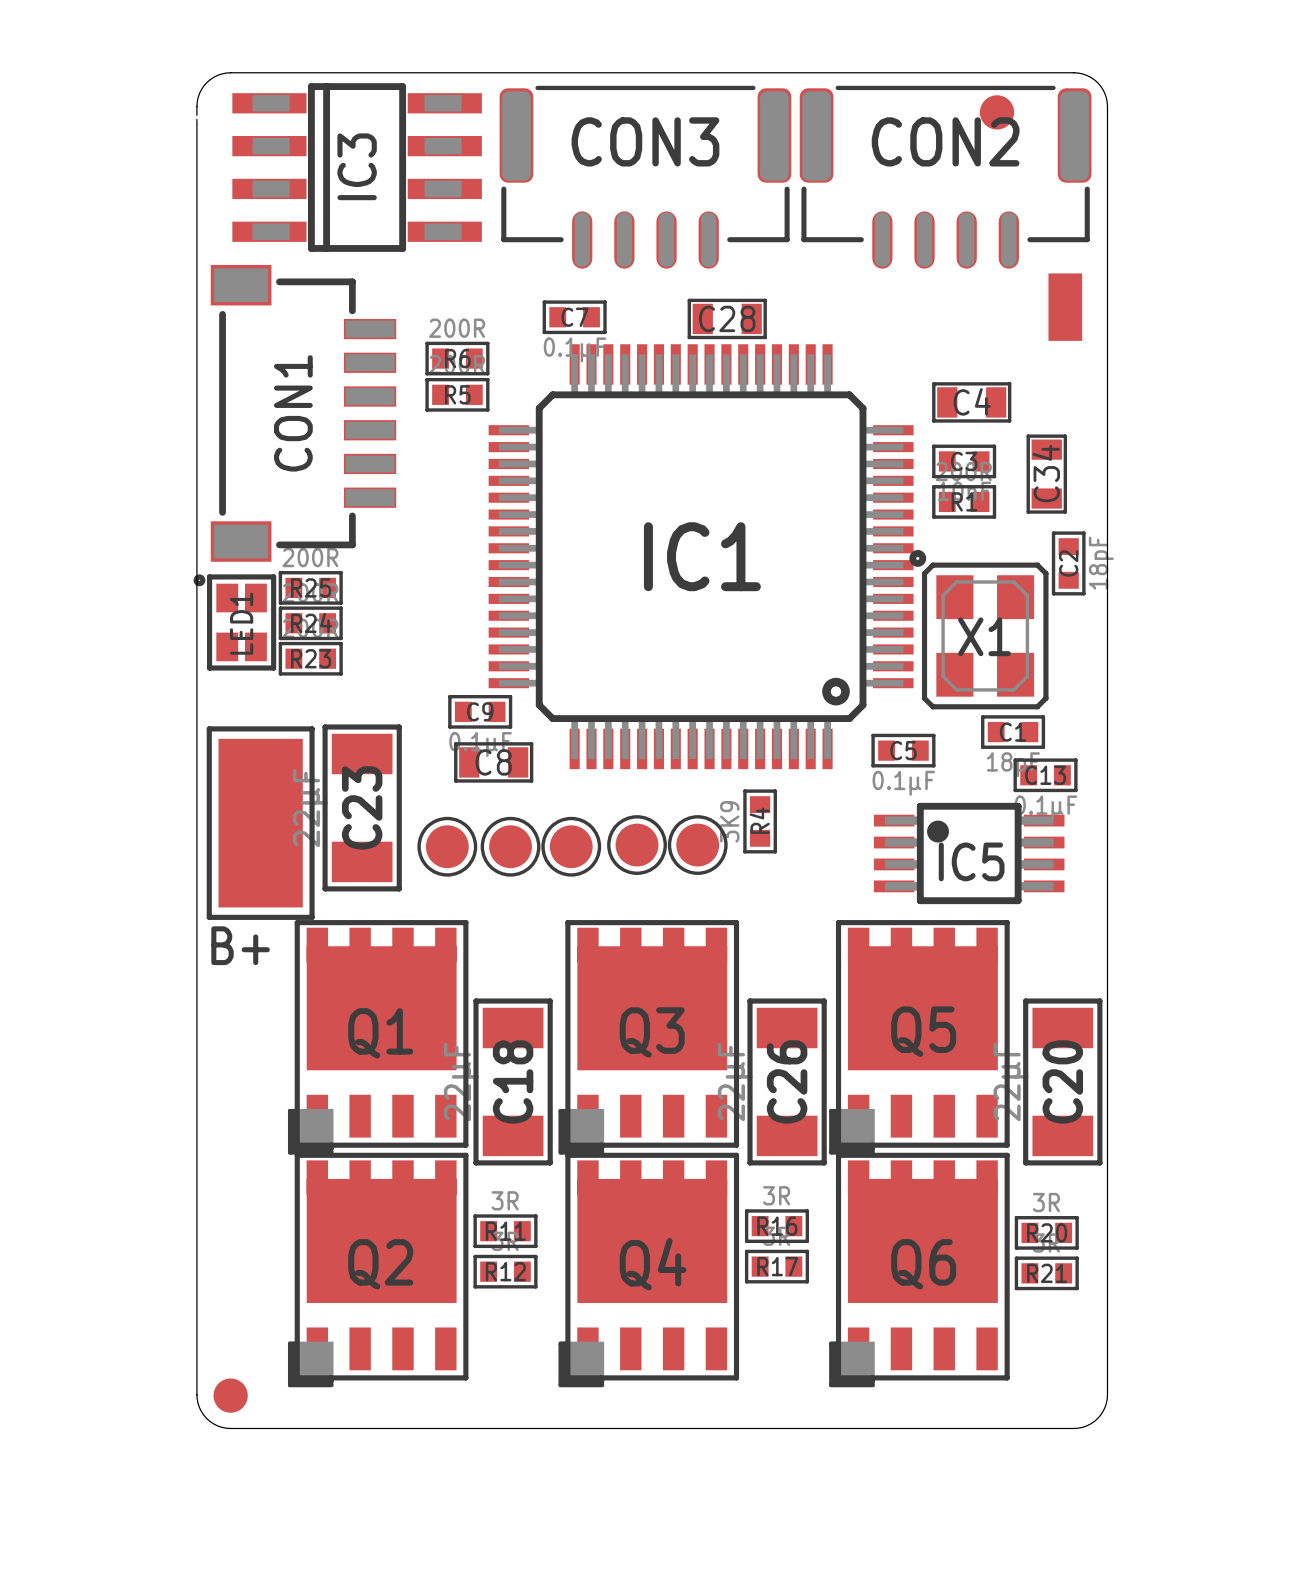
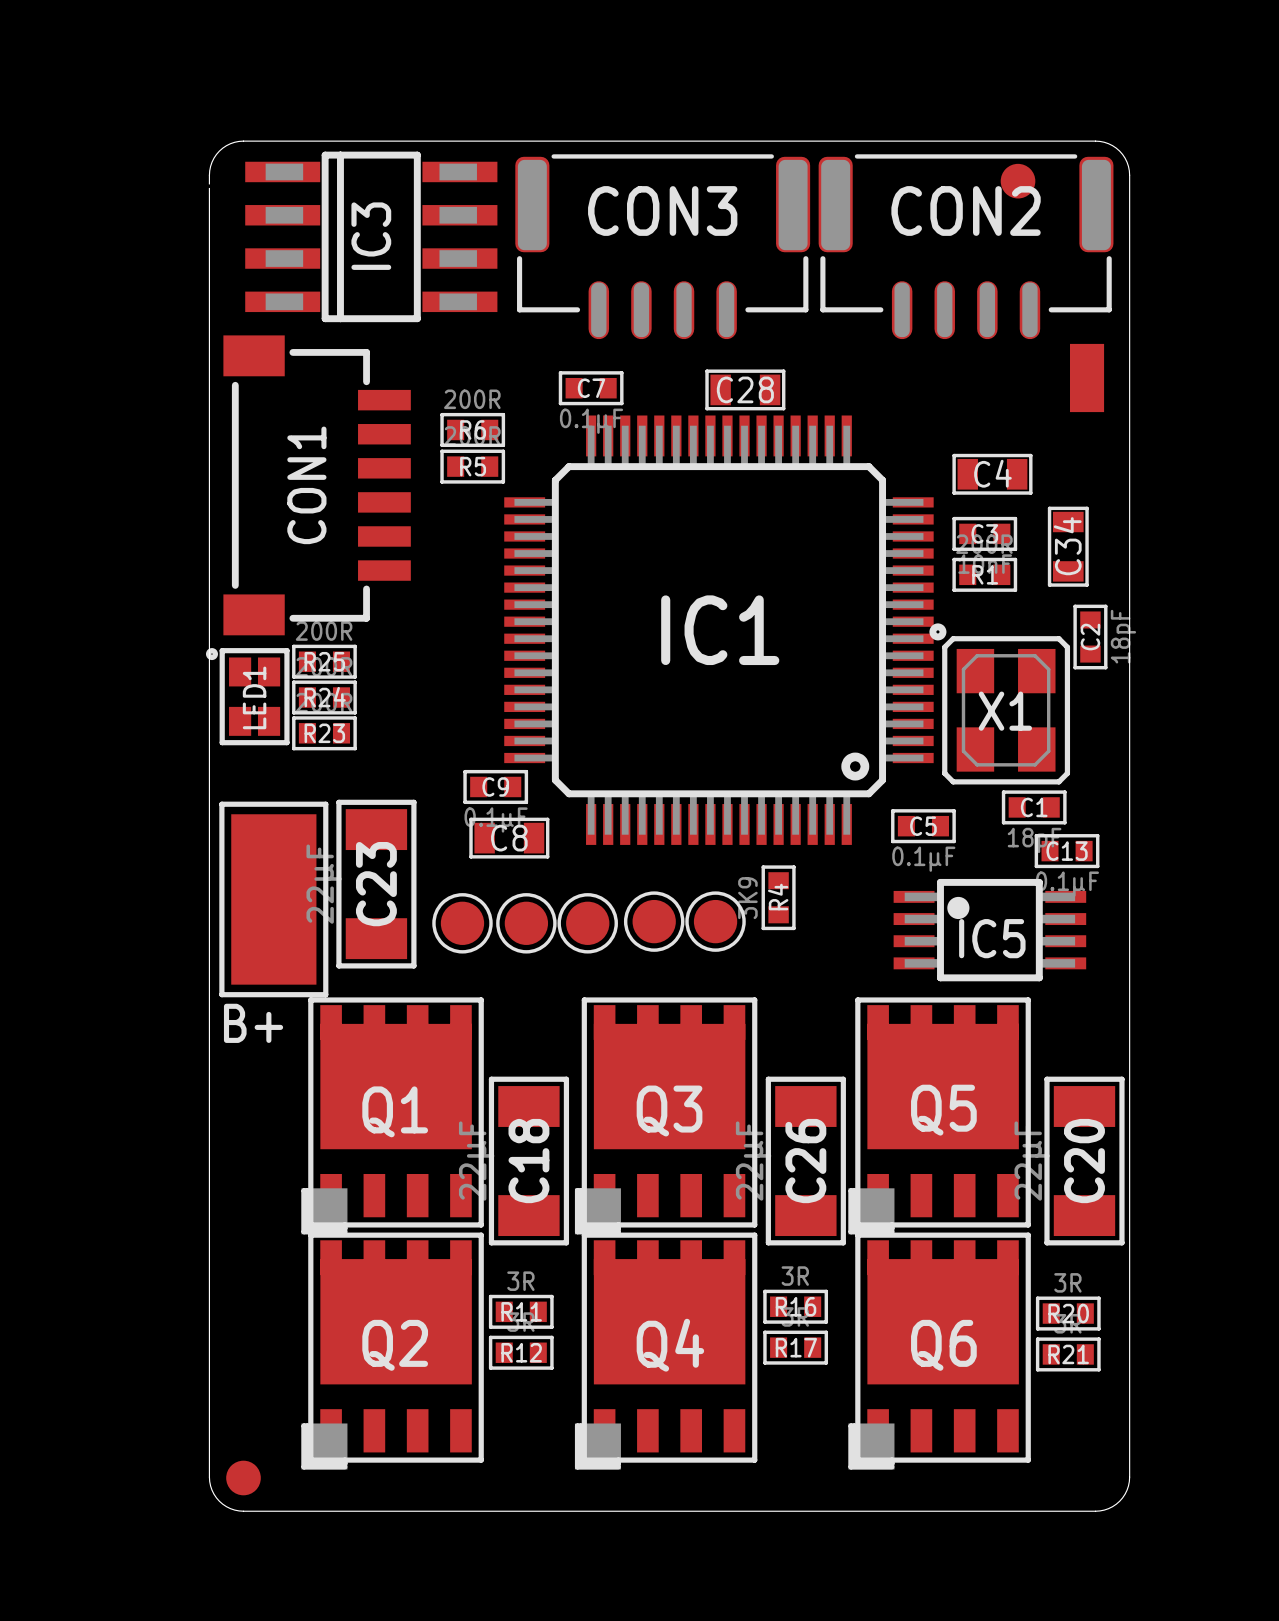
CON1 footprint: [210, 264, 397, 562] -> [223, 335, 411, 636]

